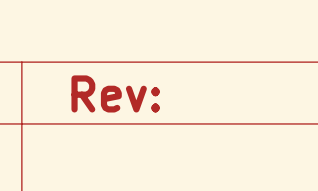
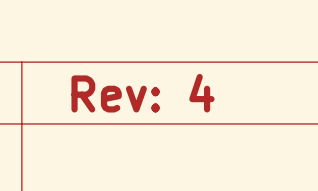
title block: Rev: (115, 93) -> Rev: 4 (143, 93)

